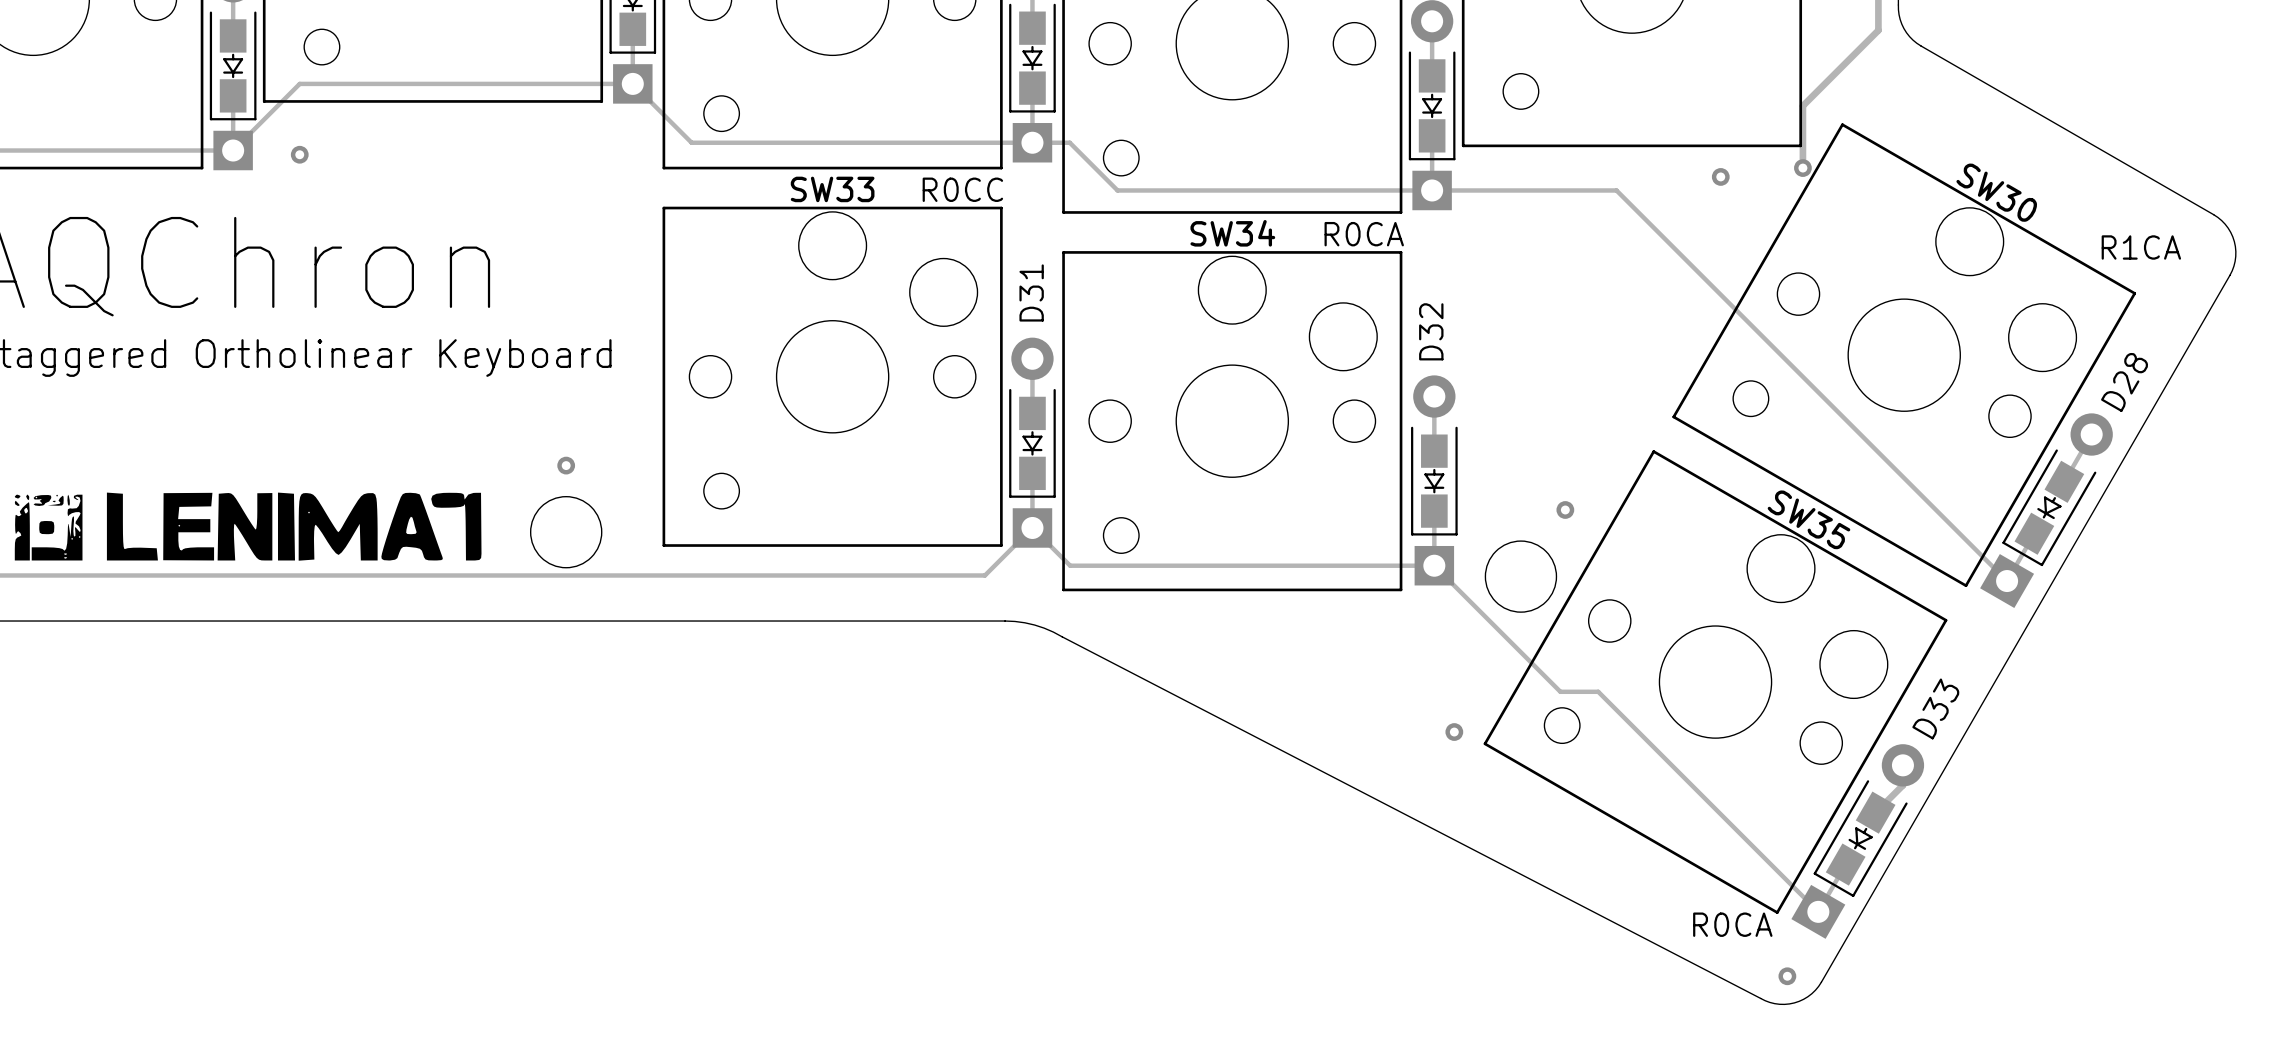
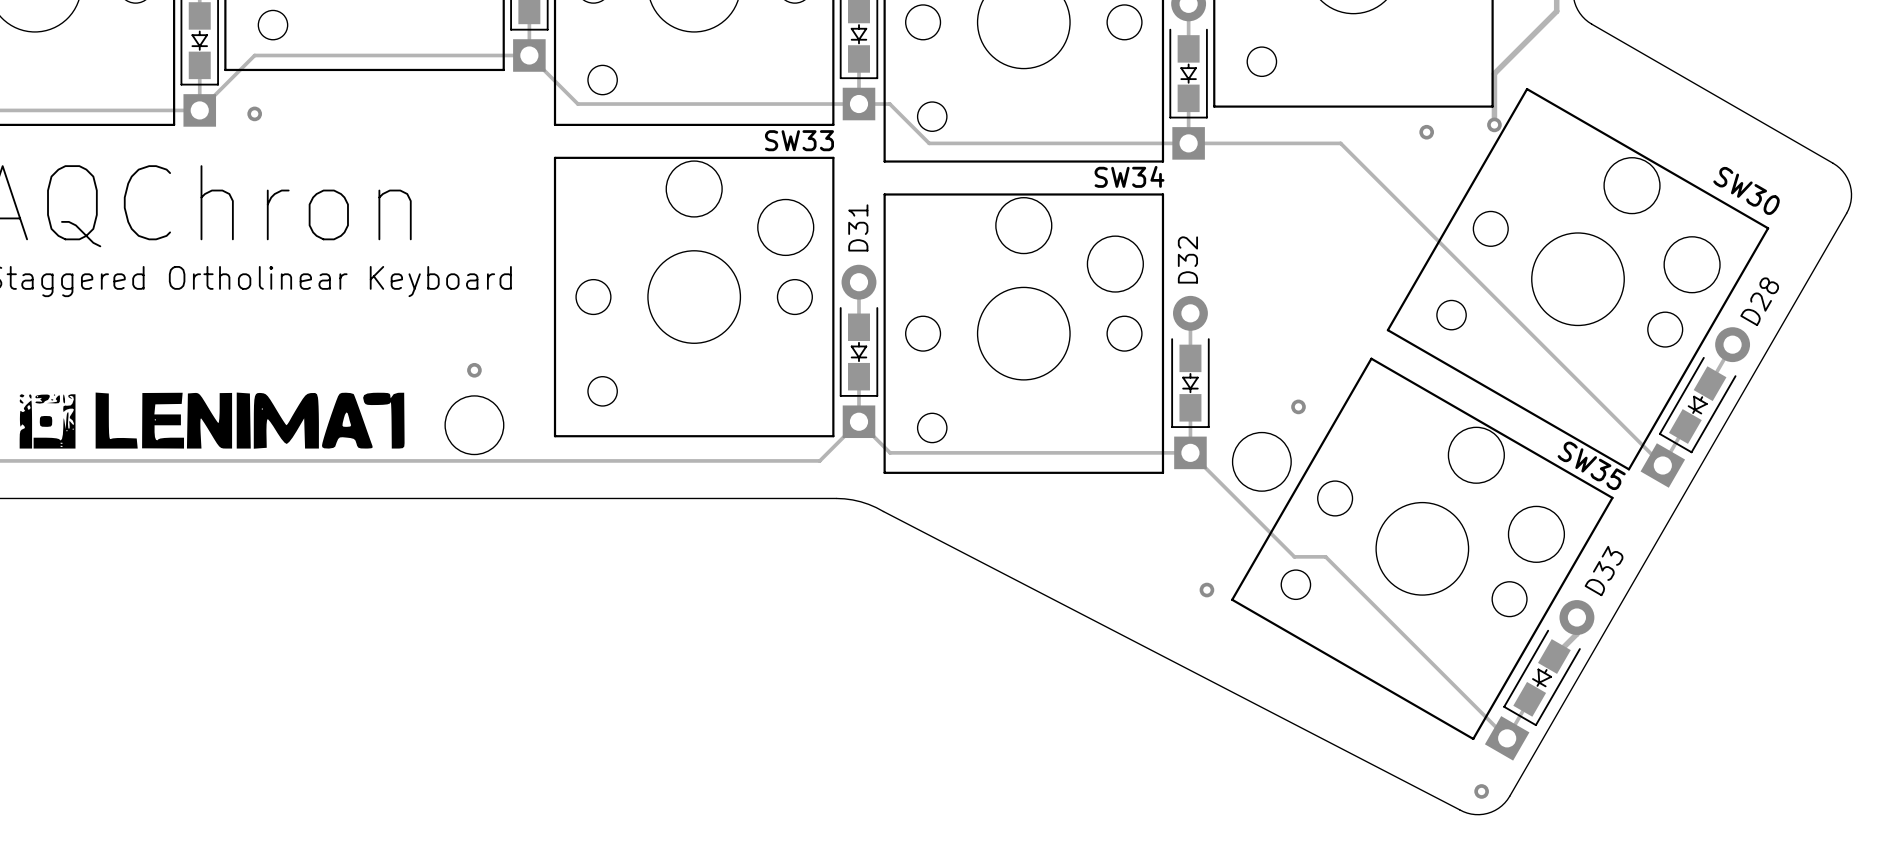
SW33 name position: SW33 (832, 189) -> SW33 (799, 140)
text: R0CC (962, 189) -> none
SW30 name position: SW30 (1996, 192) -> SW30 (1746, 190)
SW34 name position: SW34 (1232, 233) -> SW34 (1129, 176)
text: R0CA (1364, 234) -> none
text: R1CA (2141, 247) -> none
SW35 name position: SW35 (1808, 519) -> SW35 (1591, 465)
text: R0CA (1732, 924) -> none

